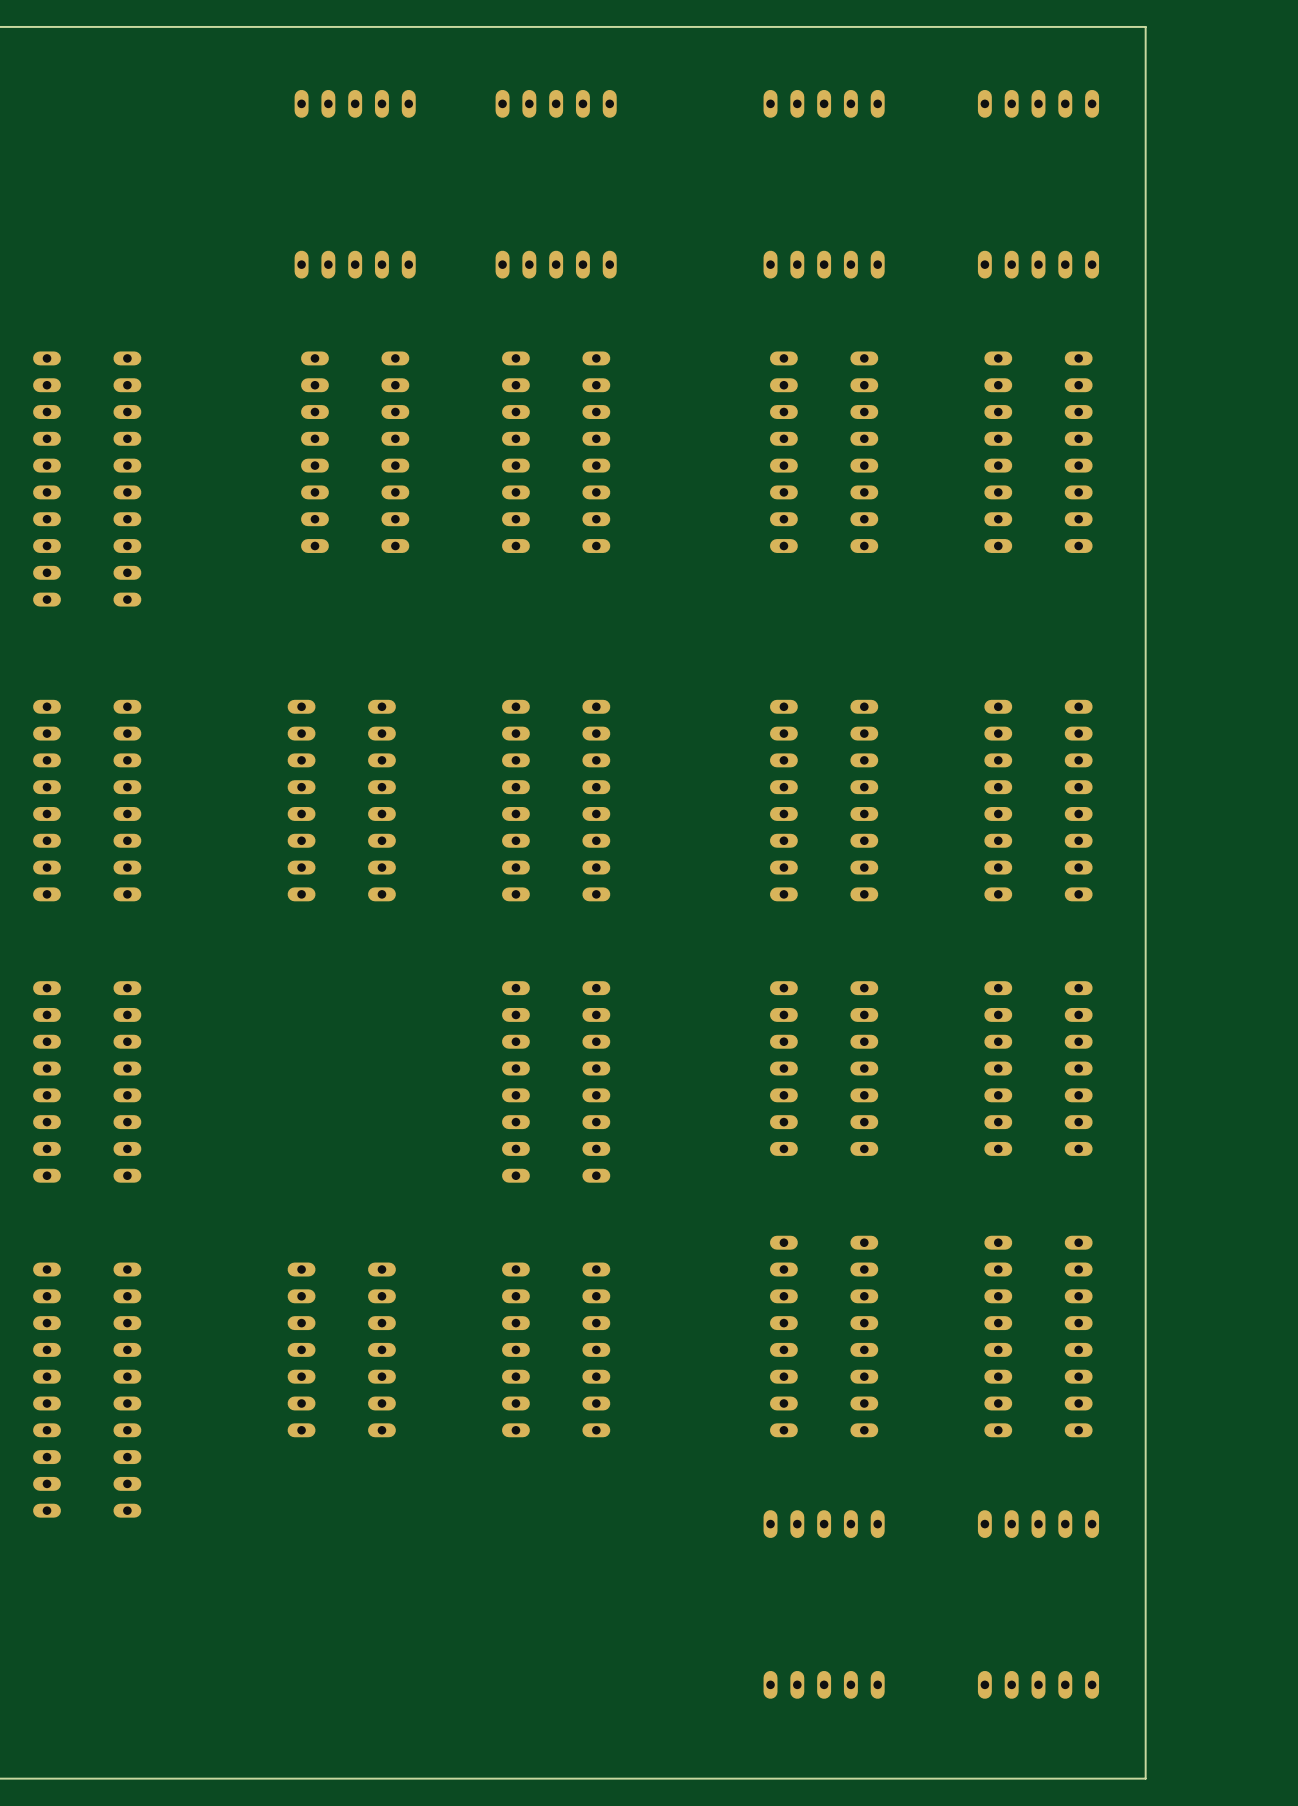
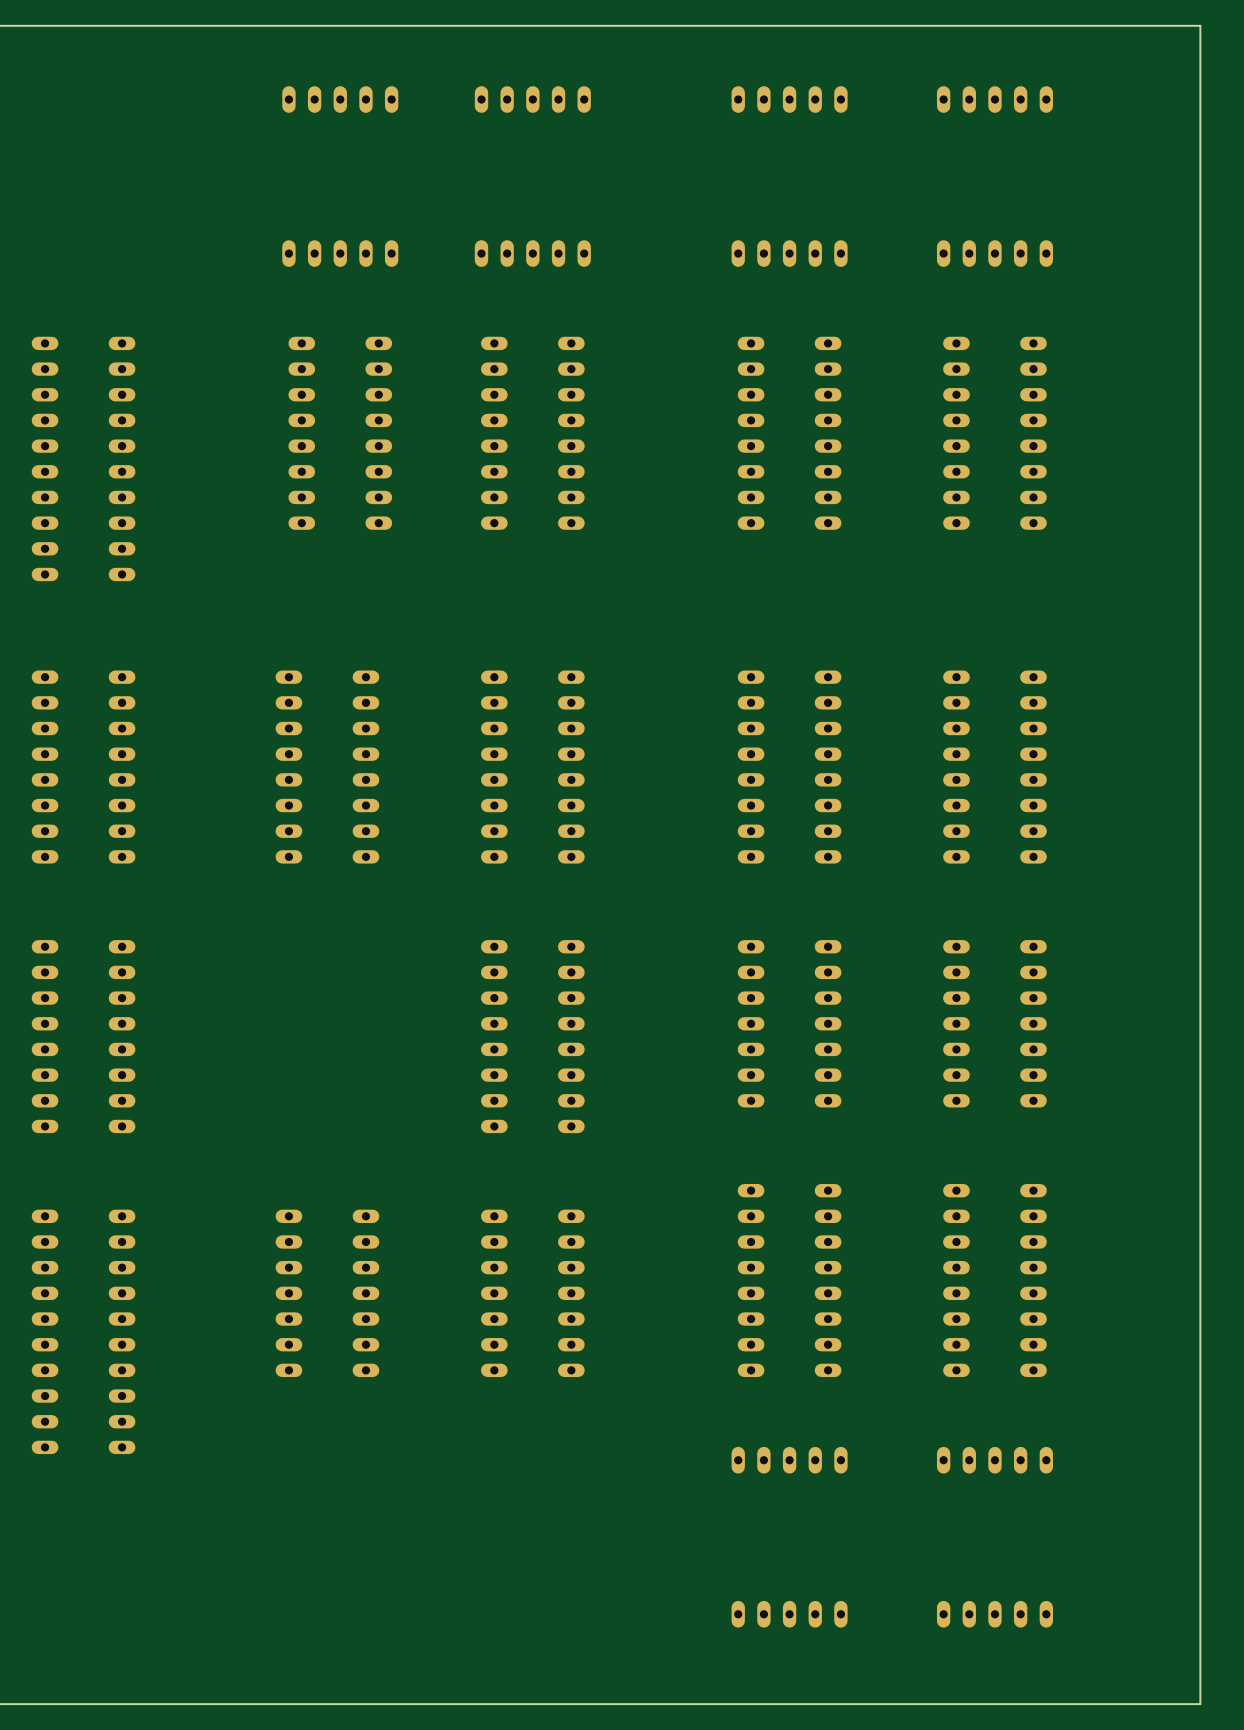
board edge: (1145, 26) (1145, 1778) -> (1097, 25) (1200, 25) (1200, 1704) (1097, 1704)

